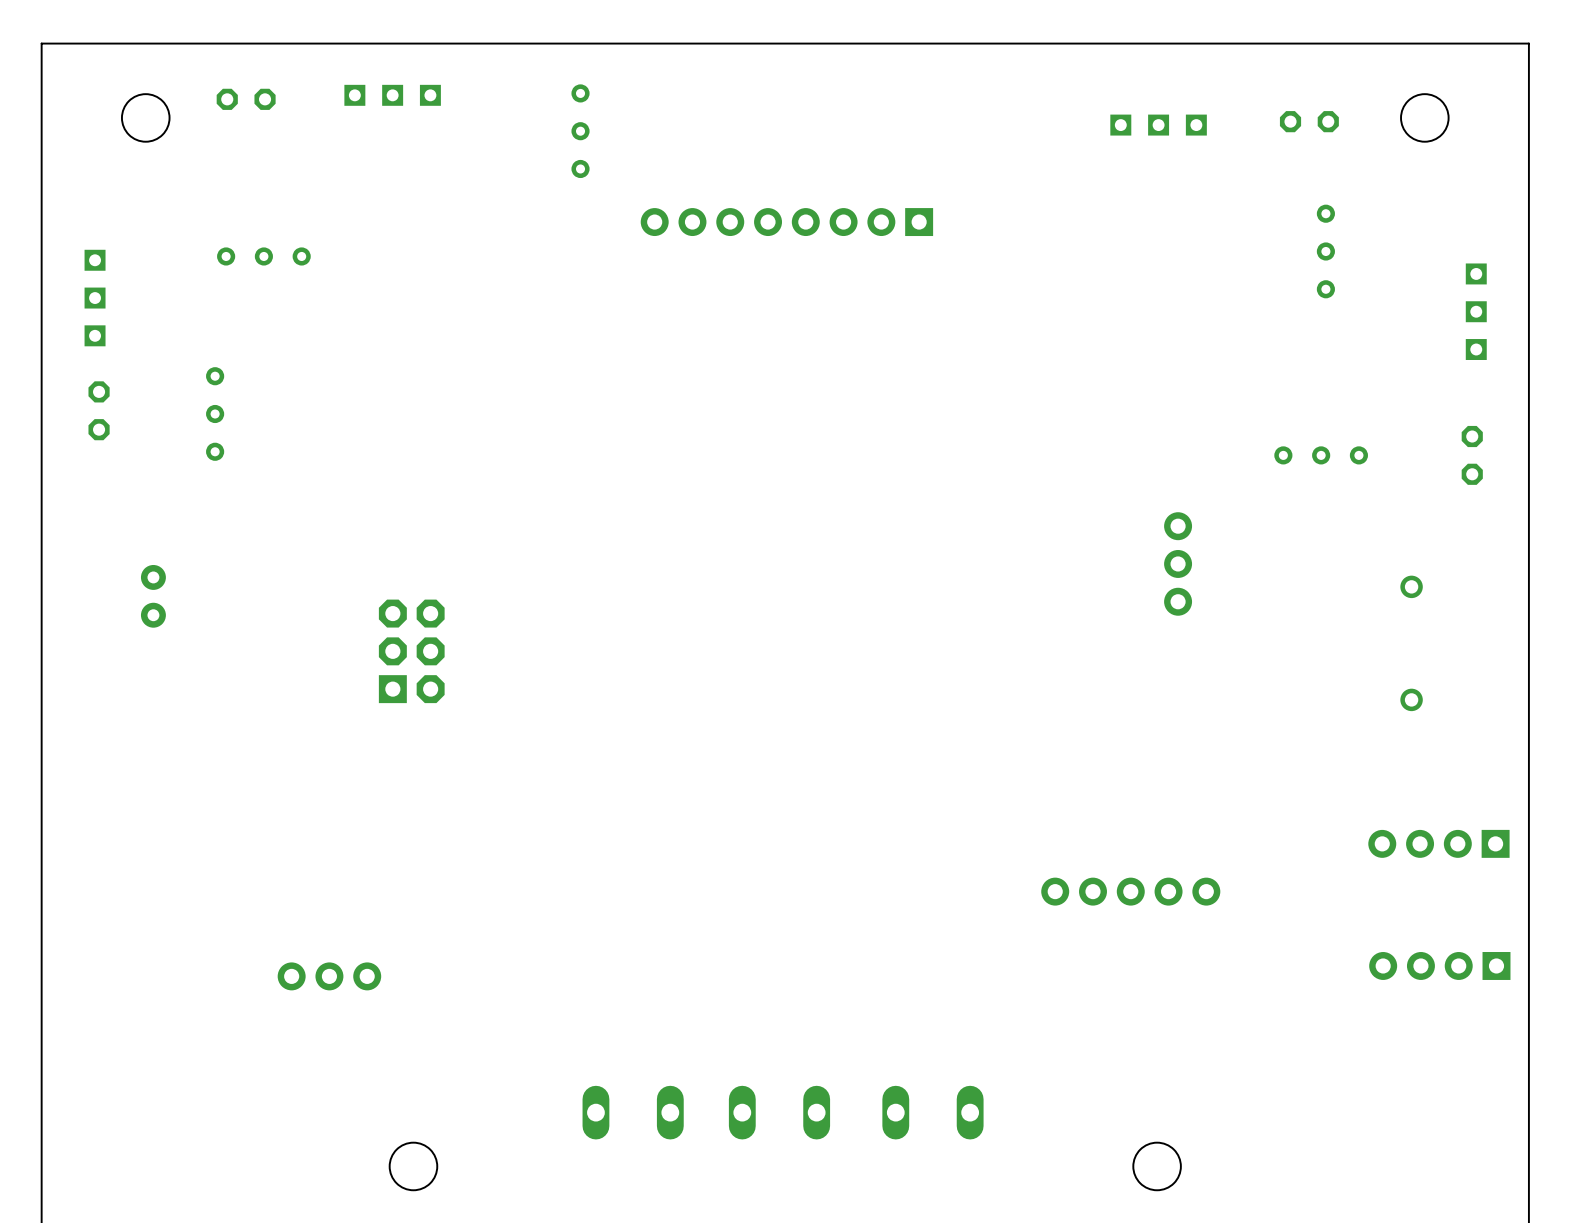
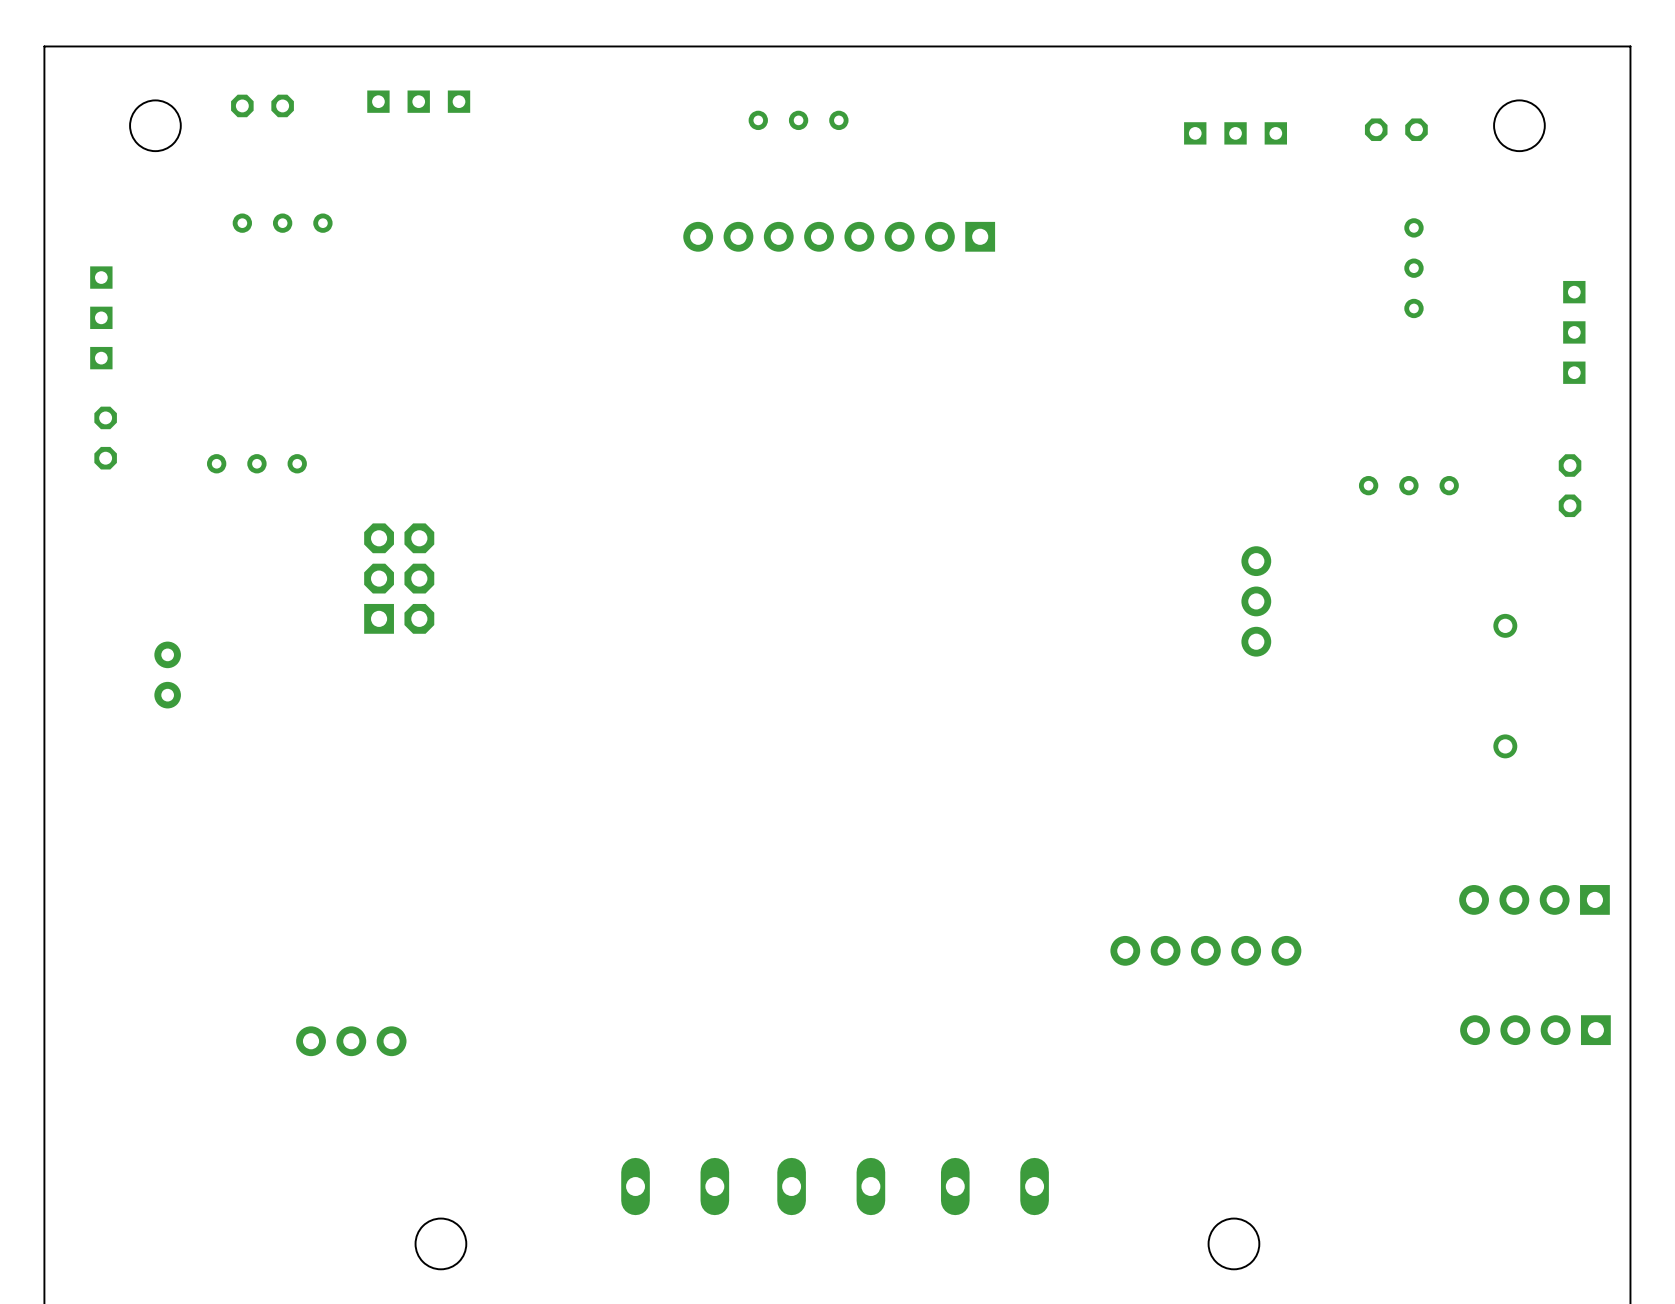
part: none -> (798, 120)
part: (580, 131) -> none
part position: (263, 256) -> (282, 223)
part rotation: 0° (215, 413) -> 90° clockwise (256, 463)
part position: (153, 596) -> (167, 675)
part position: (411, 651) -> (399, 578)

